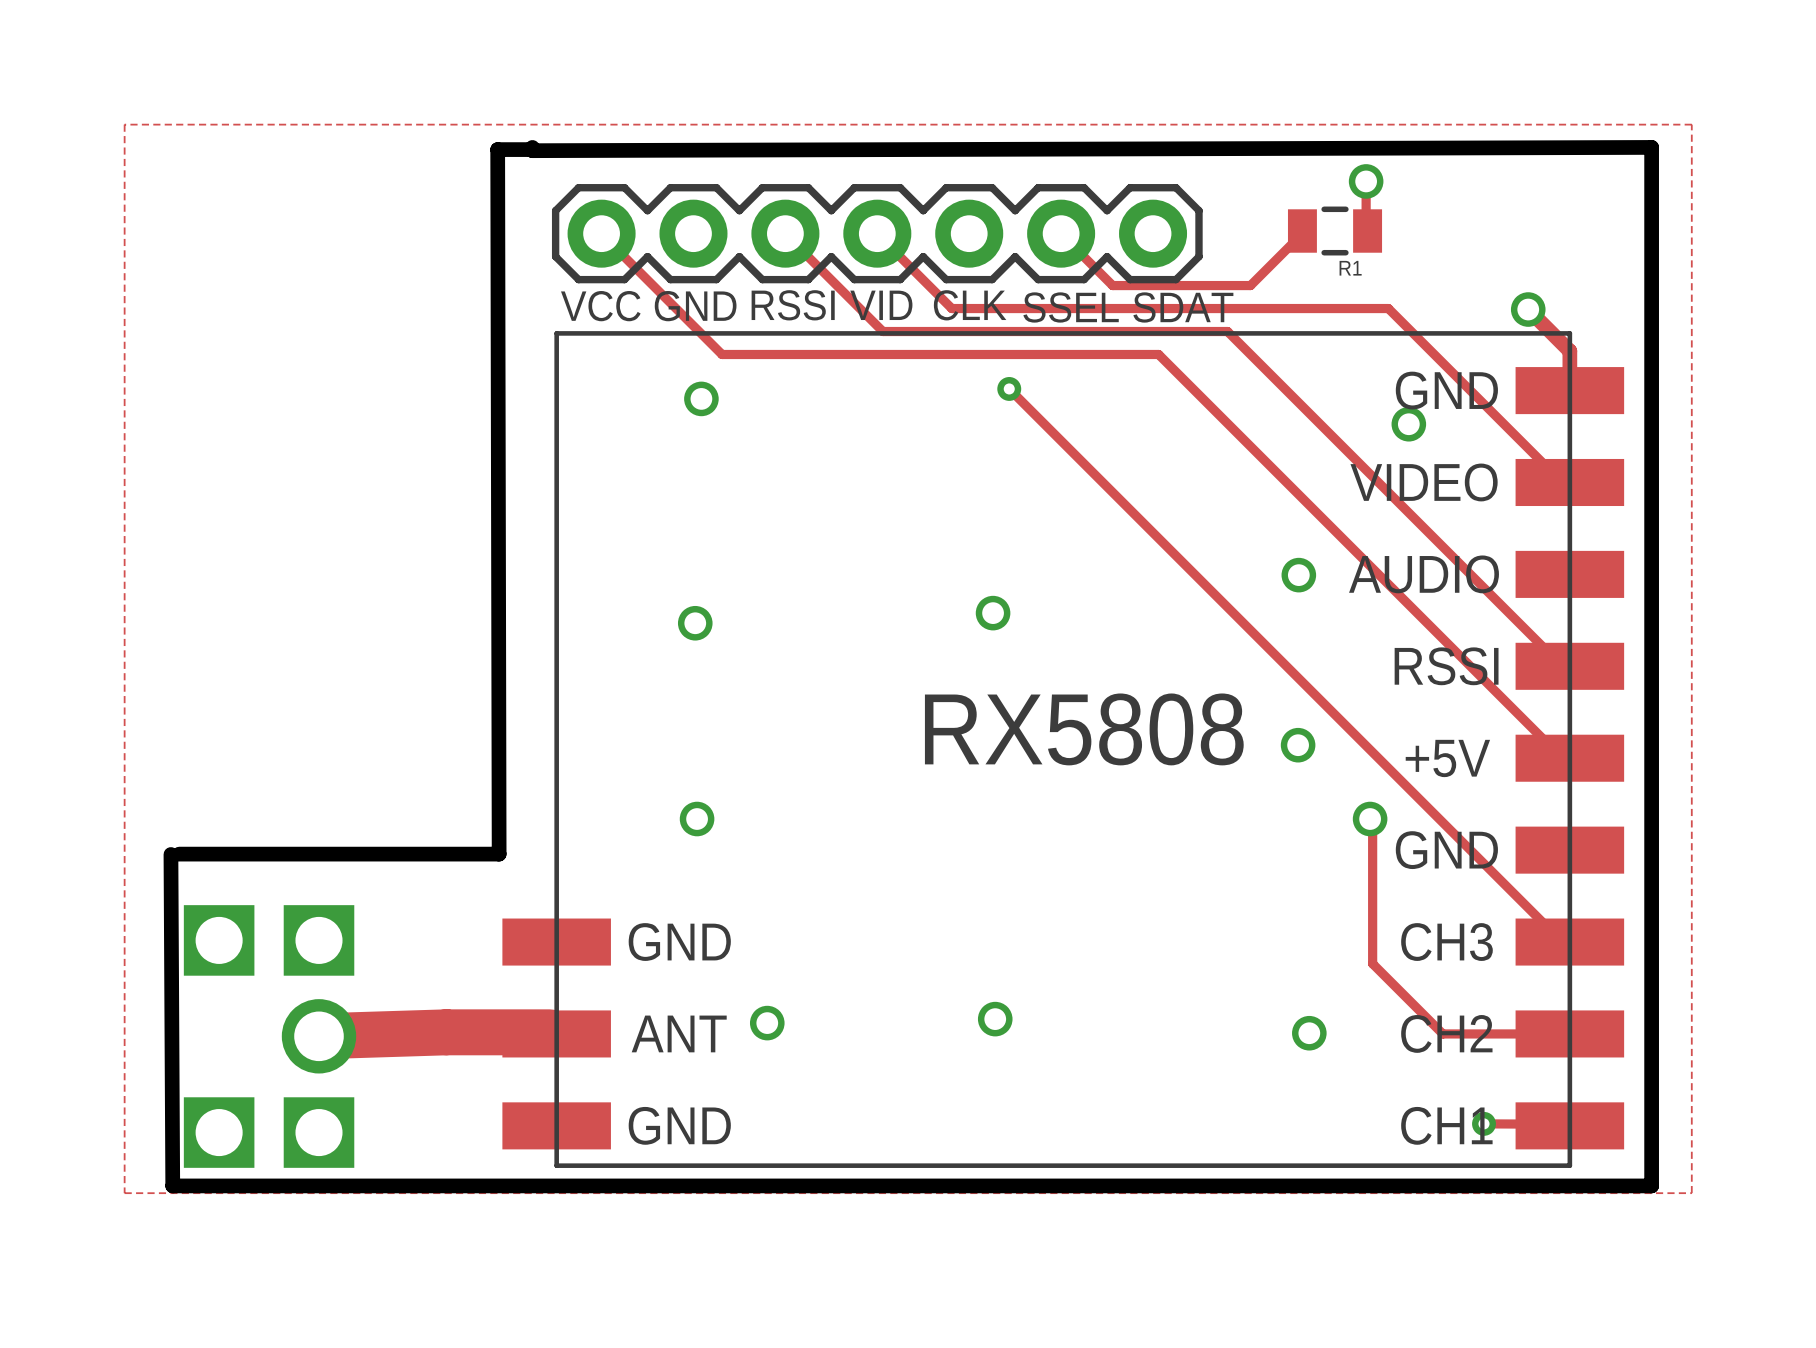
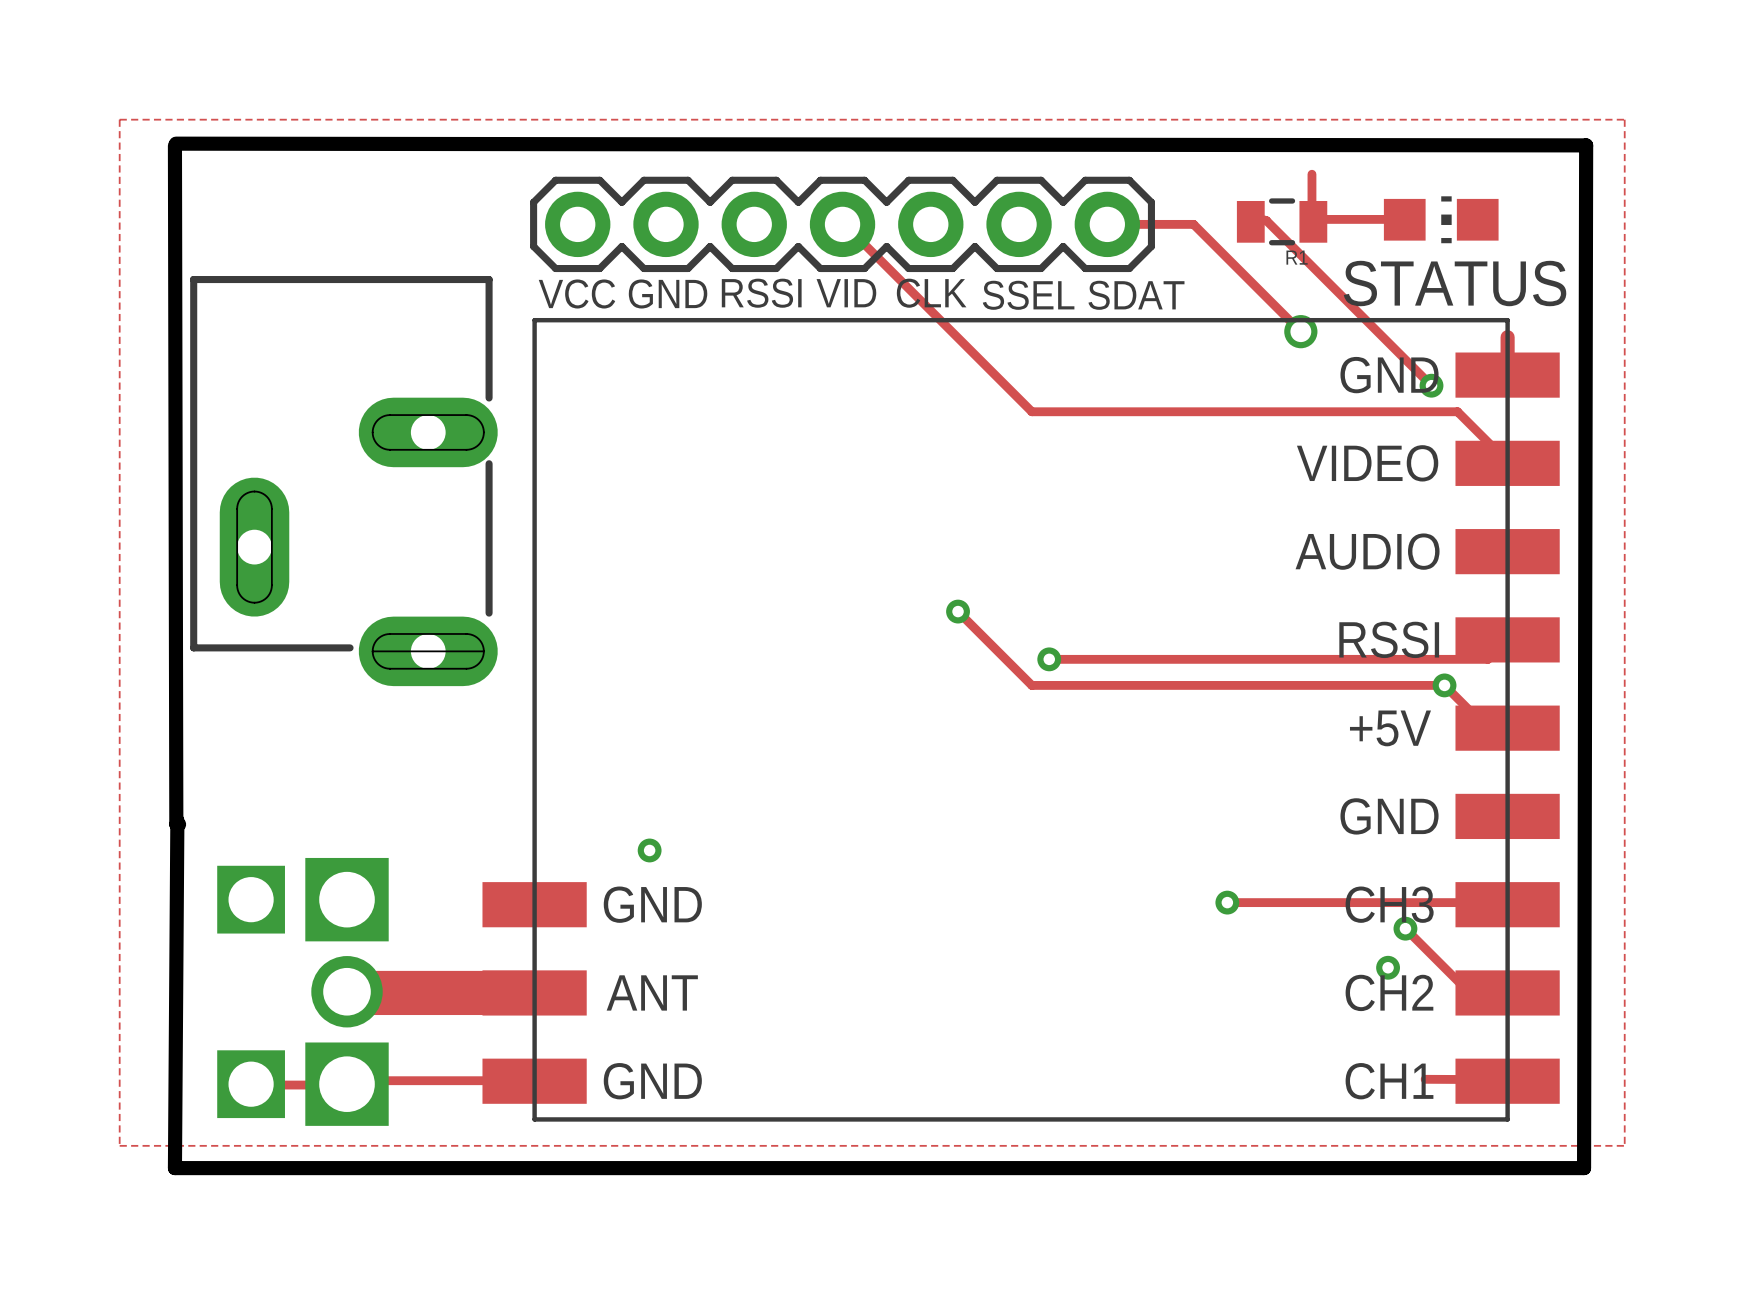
board edge: (532, 147) (532, 150) (1651, 147) (1651, 1185) (172, 1185) (170, 854) -> none
board edge: none -> (175, 143) (1586, 145) (1584, 1168) (174, 1168) (177, 820)
board edge: (532, 149) (497, 149) (499, 854) (179, 854) -> none
board edge: none -> (174, 145) (176, 824) (179, 824)
via: (1366, 181) -> none
track: none -> (1262, 219) (1266, 220) (1431, 385)
track: none -> (1324, 219) (1404, 219)
STATUS: none -> (1441, 219)
track: (1302, 231) (1296, 239) (1250, 285) (1112, 285) (1061, 233) -> none
track: (601, 233) (722, 354) (1158, 354) (1560, 756) (1569, 758) -> (958, 611) (1031, 685) (1444, 685) (1483, 724) (1505, 724) (1507, 728)
track: (785, 233) (882, 331) (1227, 331) (1560, 664) (1569, 666) -> (1049, 659) (1487, 659) (1507, 639)
track: (877, 233) (951, 308) (1388, 308) (1560, 480) (1569, 482) -> (842, 224) (1031, 411) (1457, 411) (1507, 463)
track: none -> (1107, 224) (1193, 224) (1300, 331)
track: (1528, 309) (1569, 351) -> none
via: (1528, 309) -> none
via: none -> (1300, 331)
track: (1009, 388) (1560, 940) (1569, 942) -> (1227, 902) (1505, 902) (1507, 904)
via: (1009, 388) -> none
via: (701, 398) -> none
via: none -> (1431, 385)
via: (1408, 424) -> none
part: none -> (343, 481)
via: (1298, 575) -> none
via position: (993, 613) -> (958, 611)
via: (695, 623) -> none
via: none -> (1049, 659)
via: none -> (1444, 685)
part text: RX5808 (1084, 729) -> none
via: (1298, 745) -> none
via: (697, 819) -> none
track: (1370, 819) (1372, 821) (1372, 963) (1442, 1033) (1569, 1033) -> (1405, 928) (1466, 989) (1505, 989) (1507, 992)
via: (1370, 819) -> none
via: none -> (649, 850)
via: none -> (1227, 902)
via: none -> (1405, 928)
via: none -> (1388, 967)
via: (995, 1019) -> none
via: (767, 1023) -> none
part: none -> (302, 991)
track: (556, 1033) (549, 1032) (446, 1032) (318, 1036) -> (534, 992) (347, 991)
via: (1309, 1033) -> none
part: (270, 1036) -> none
via: (1484, 1123) -> none
track: none -> (534, 1081) (349, 1080) (345, 1085) (251, 1084)

